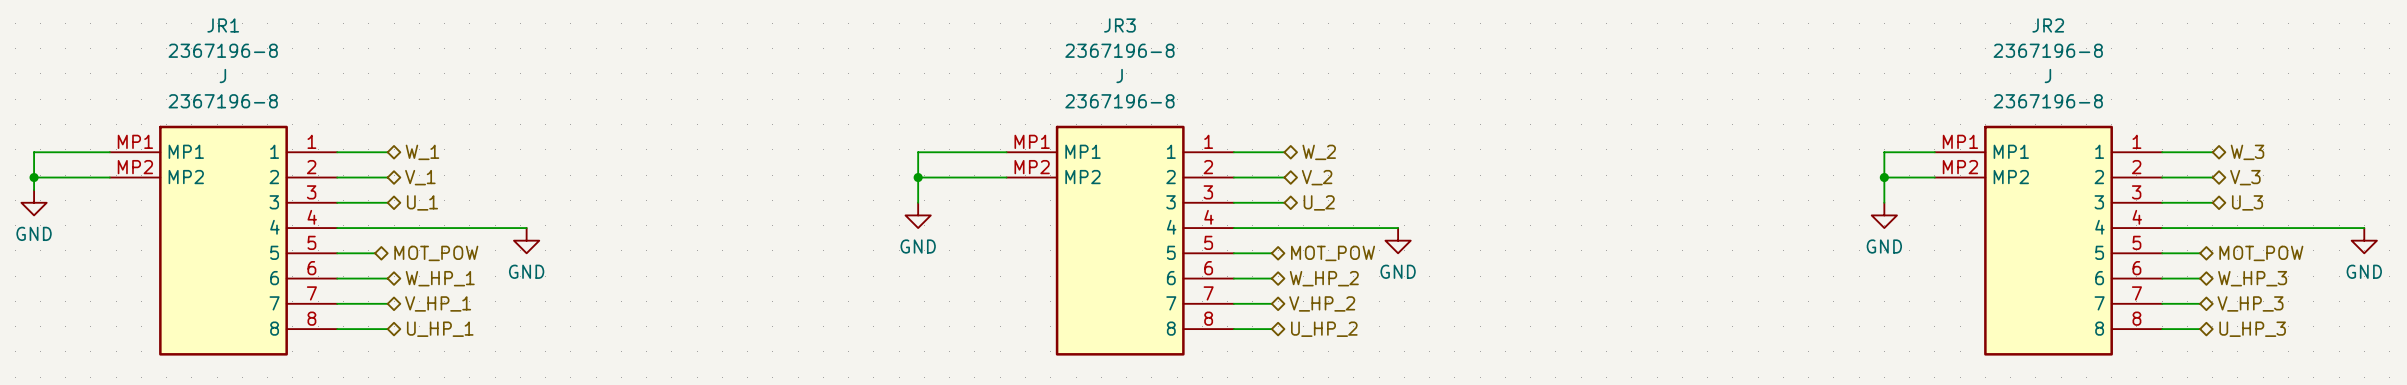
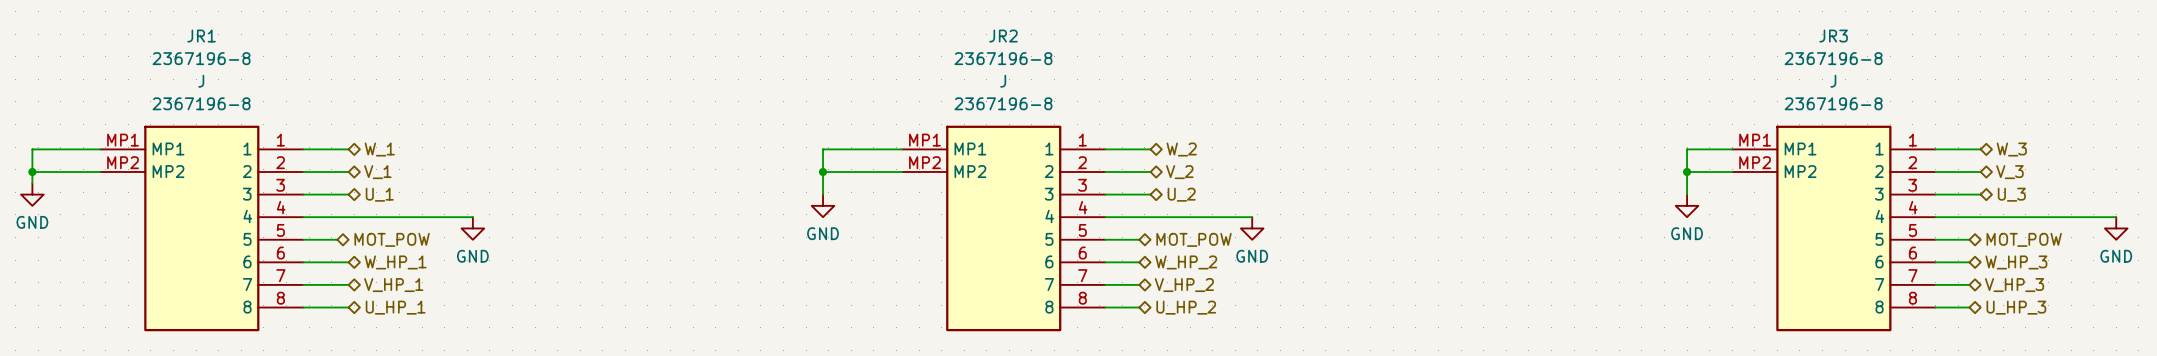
JR3 name: JR3 (1119, 25) -> JR2 (1003, 36)
JR2 name: JR2 (2048, 25) -> JR3 (1833, 36)

